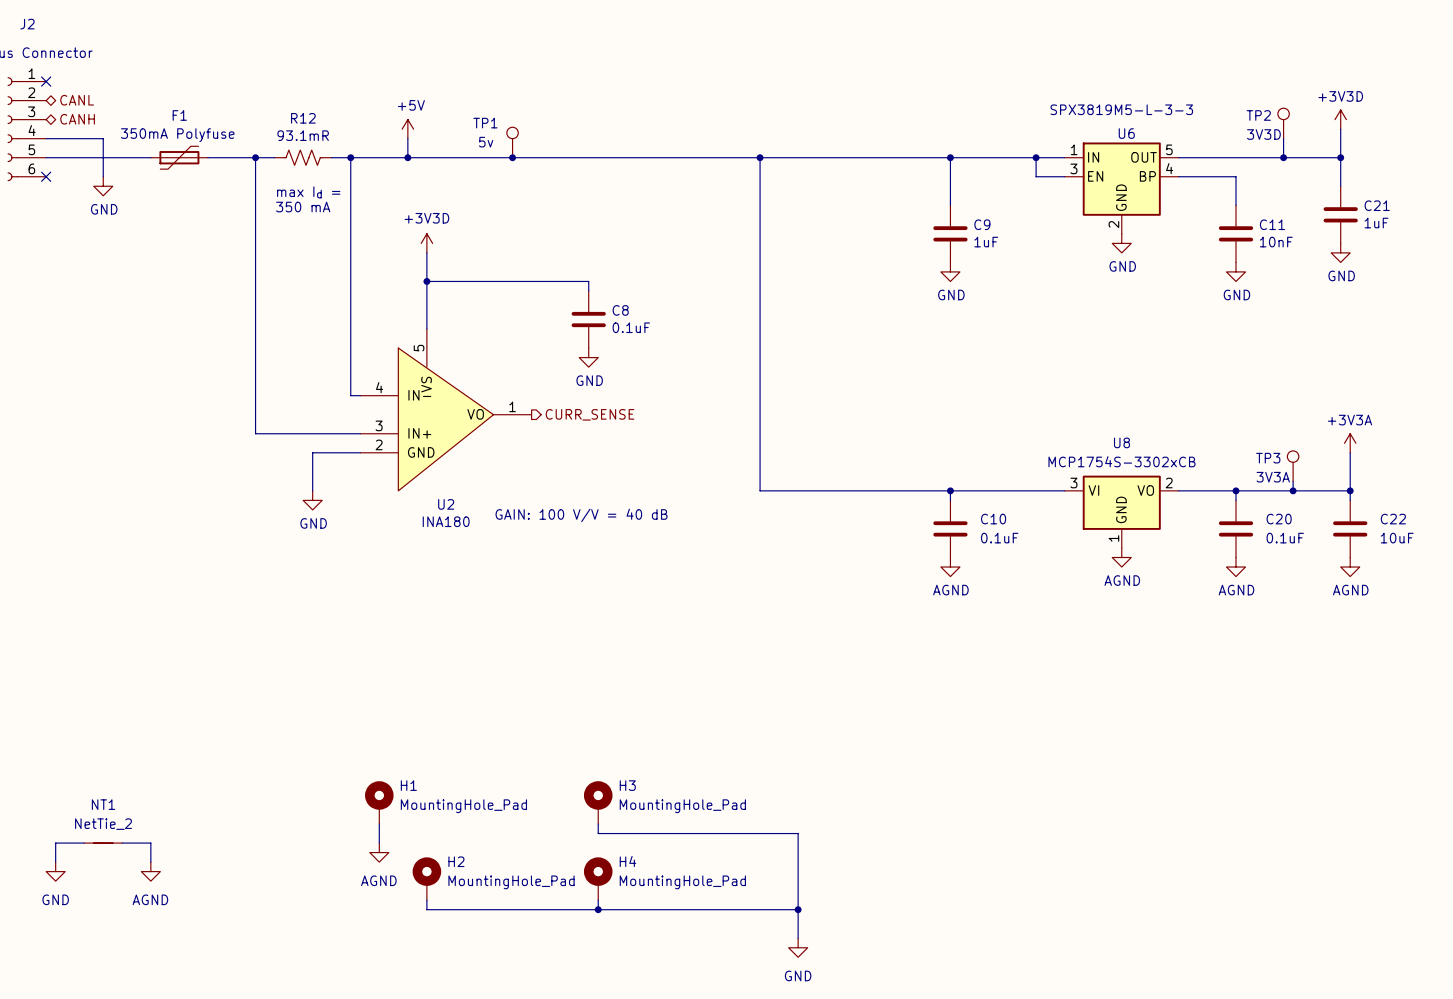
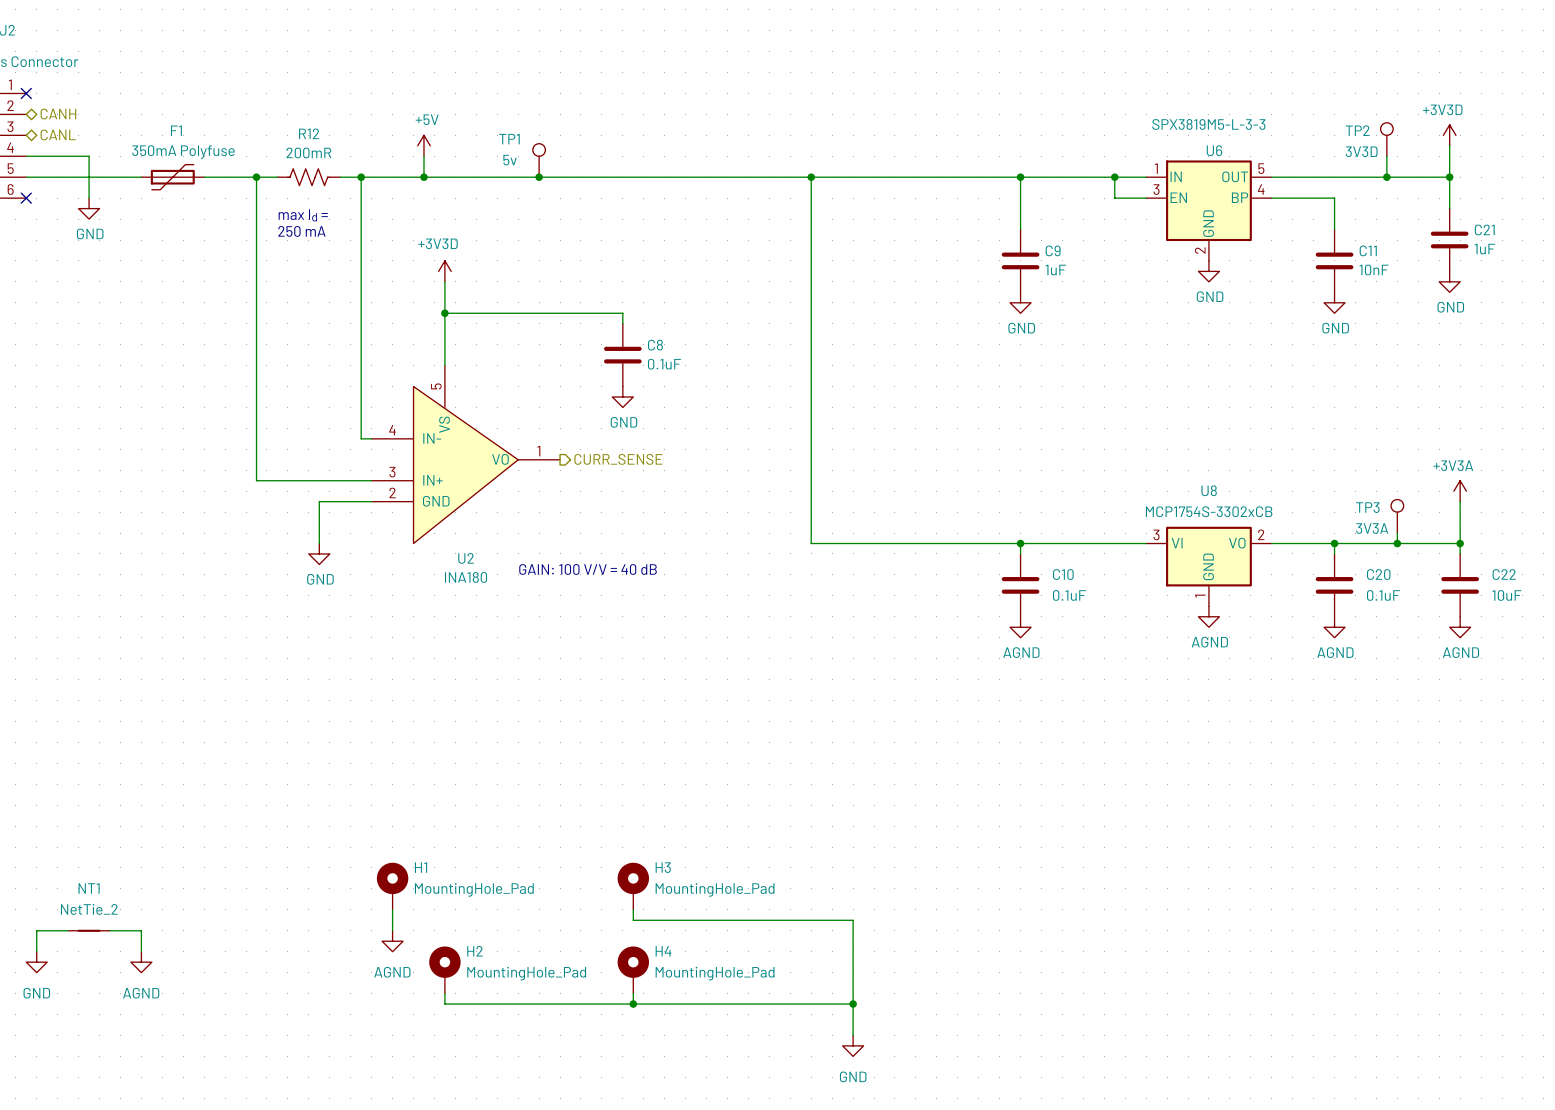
hierarchical label: CANL (77, 100) -> CANH (58, 114)
hierarchical label: CANH (77, 119) -> CANL (58, 134)
R12 value: 93.1mR (303, 135) -> 200mR (308, 152)
text: 350 mA (303, 207) -> 250 mA (301, 231)

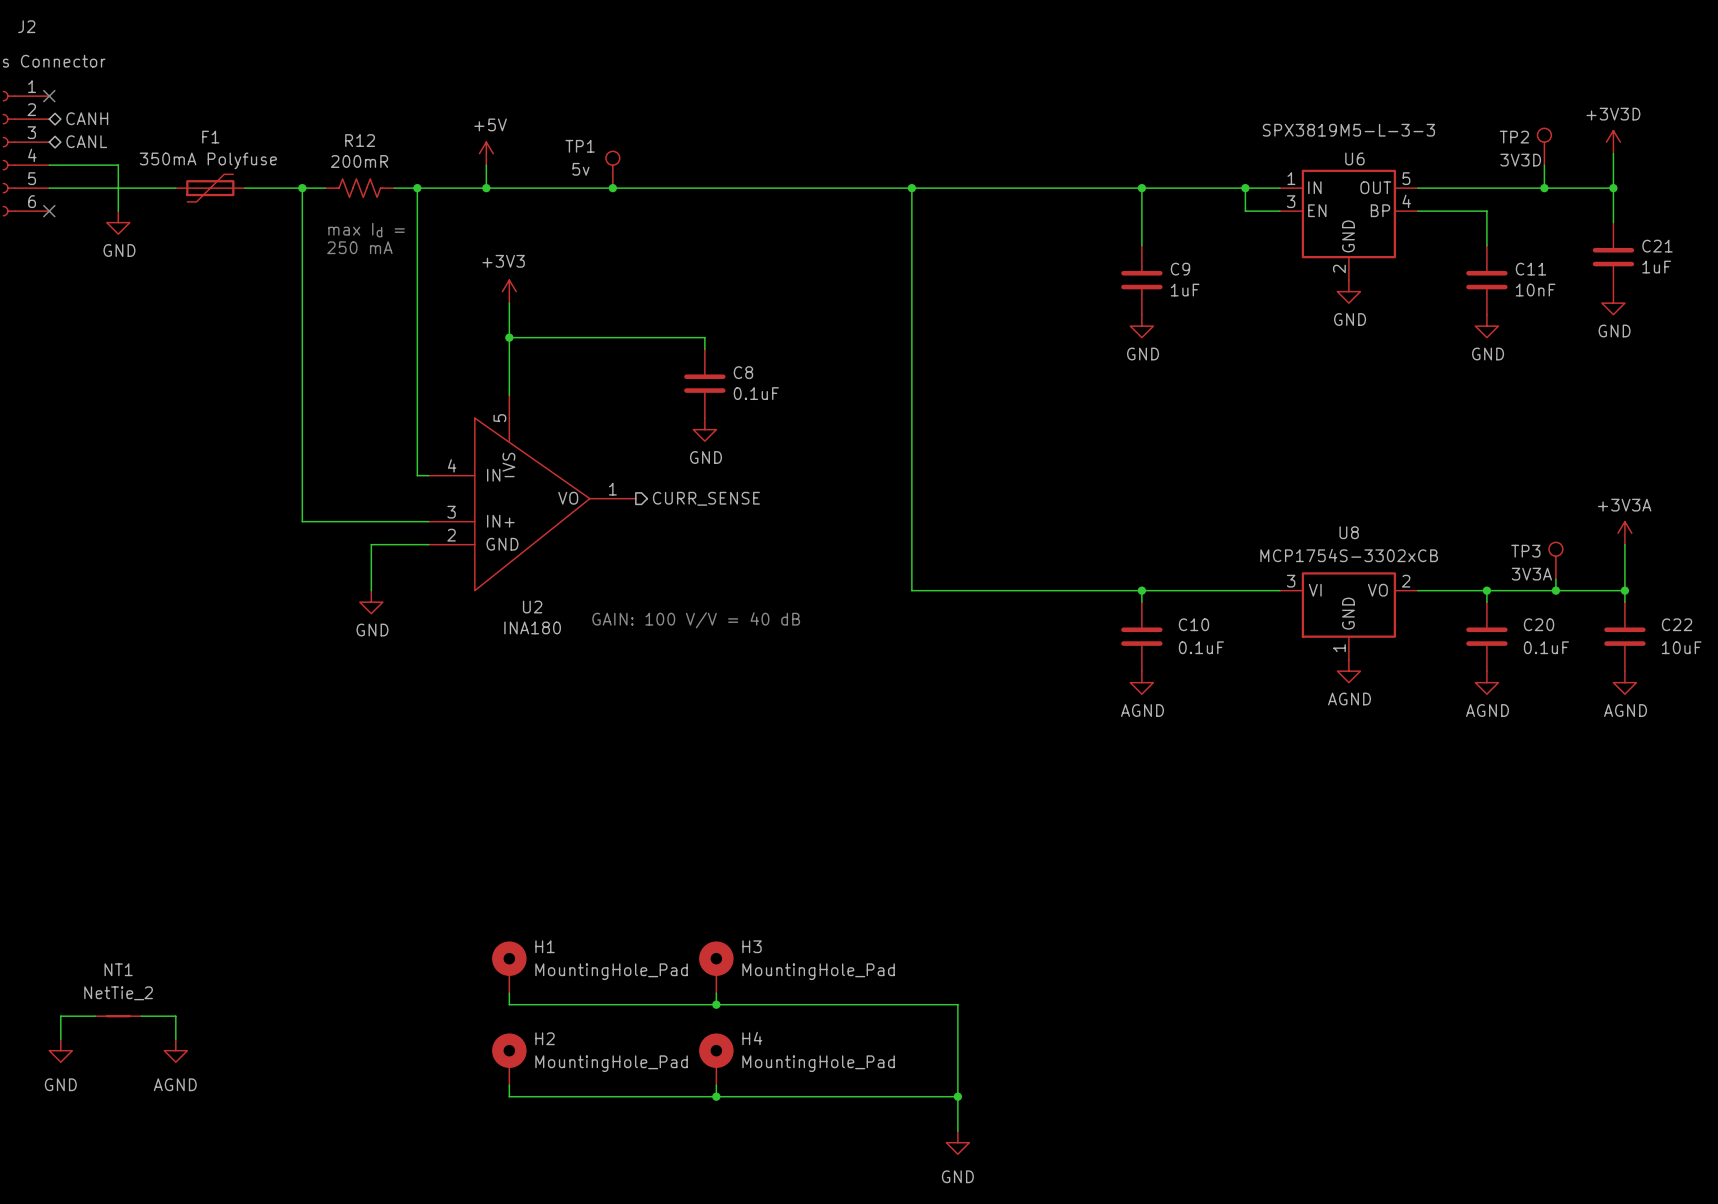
power symbol: +3V3D (444, 271) -> +3V3 (509, 291)
H1 position: (392, 886) -> (509, 967)
wire: (392, 909) (392, 930) -> none
wire: none -> (509, 993) (509, 1004) (716, 1004)
junction: none -> (716, 1004)
power symbol: AGND (392, 941) -> none

